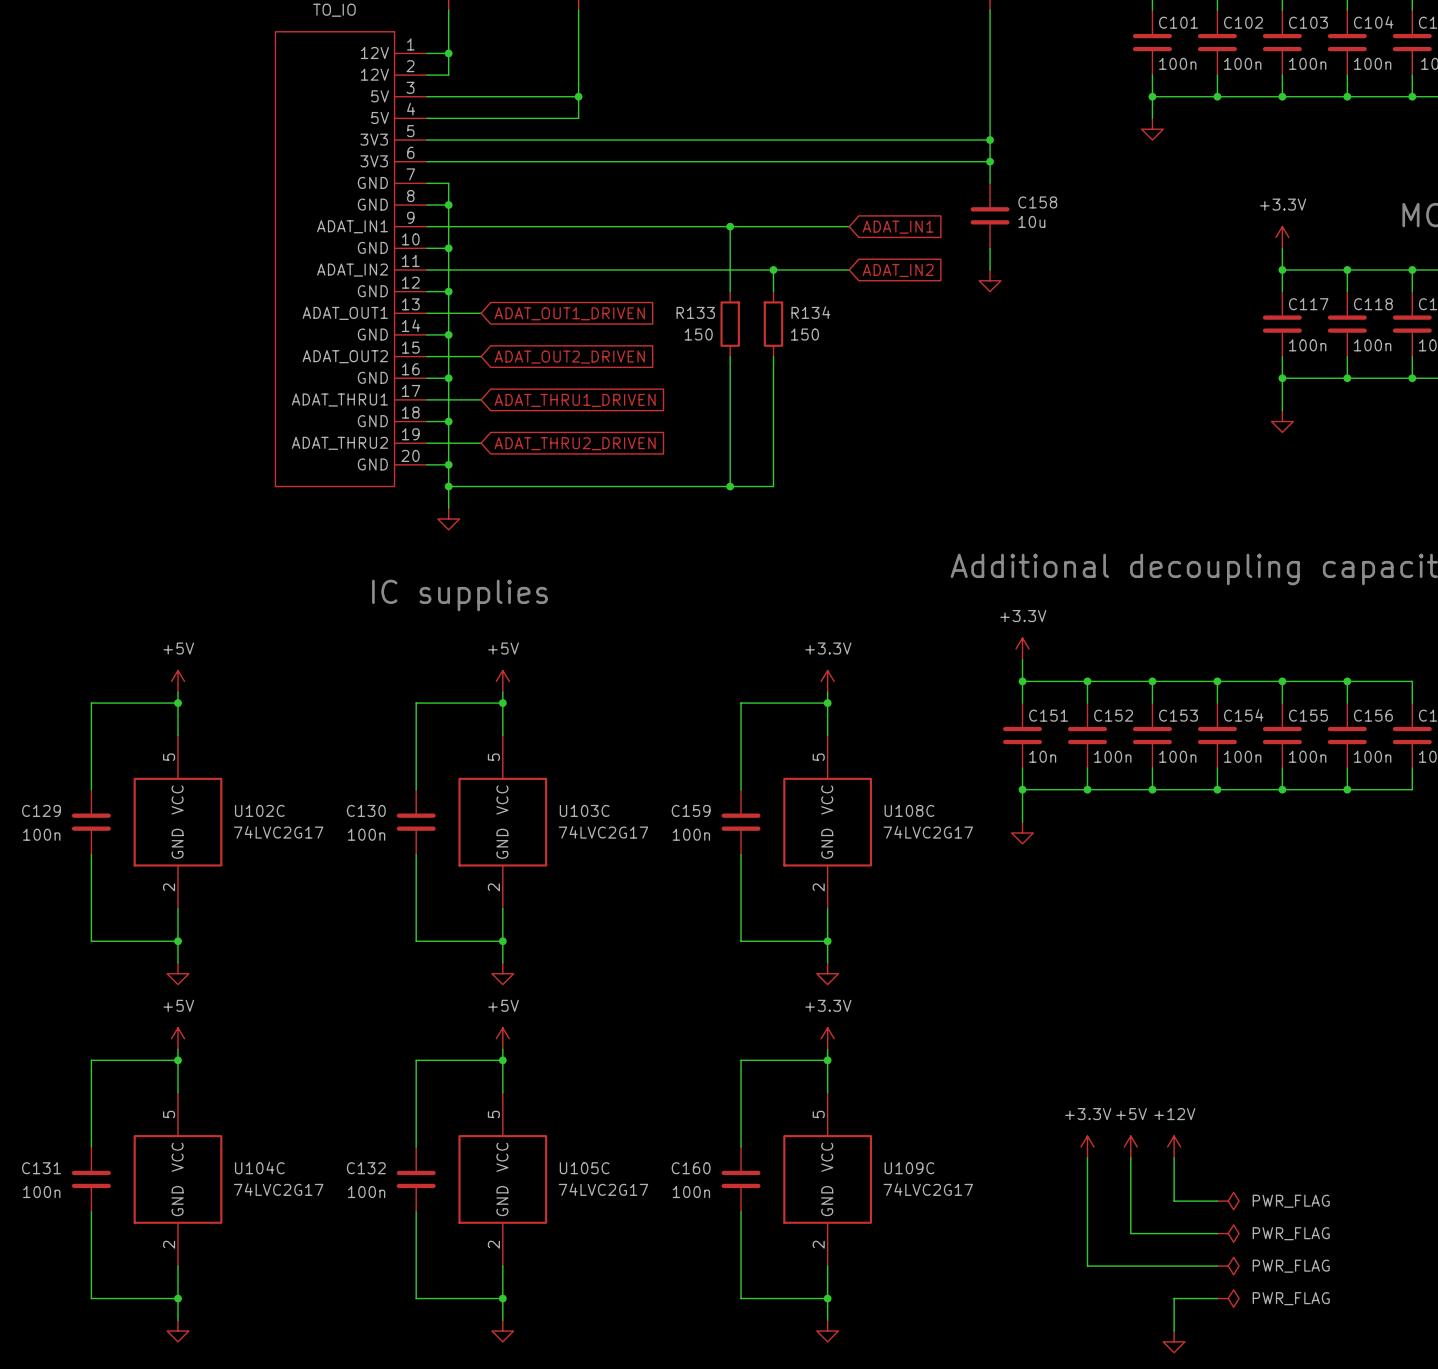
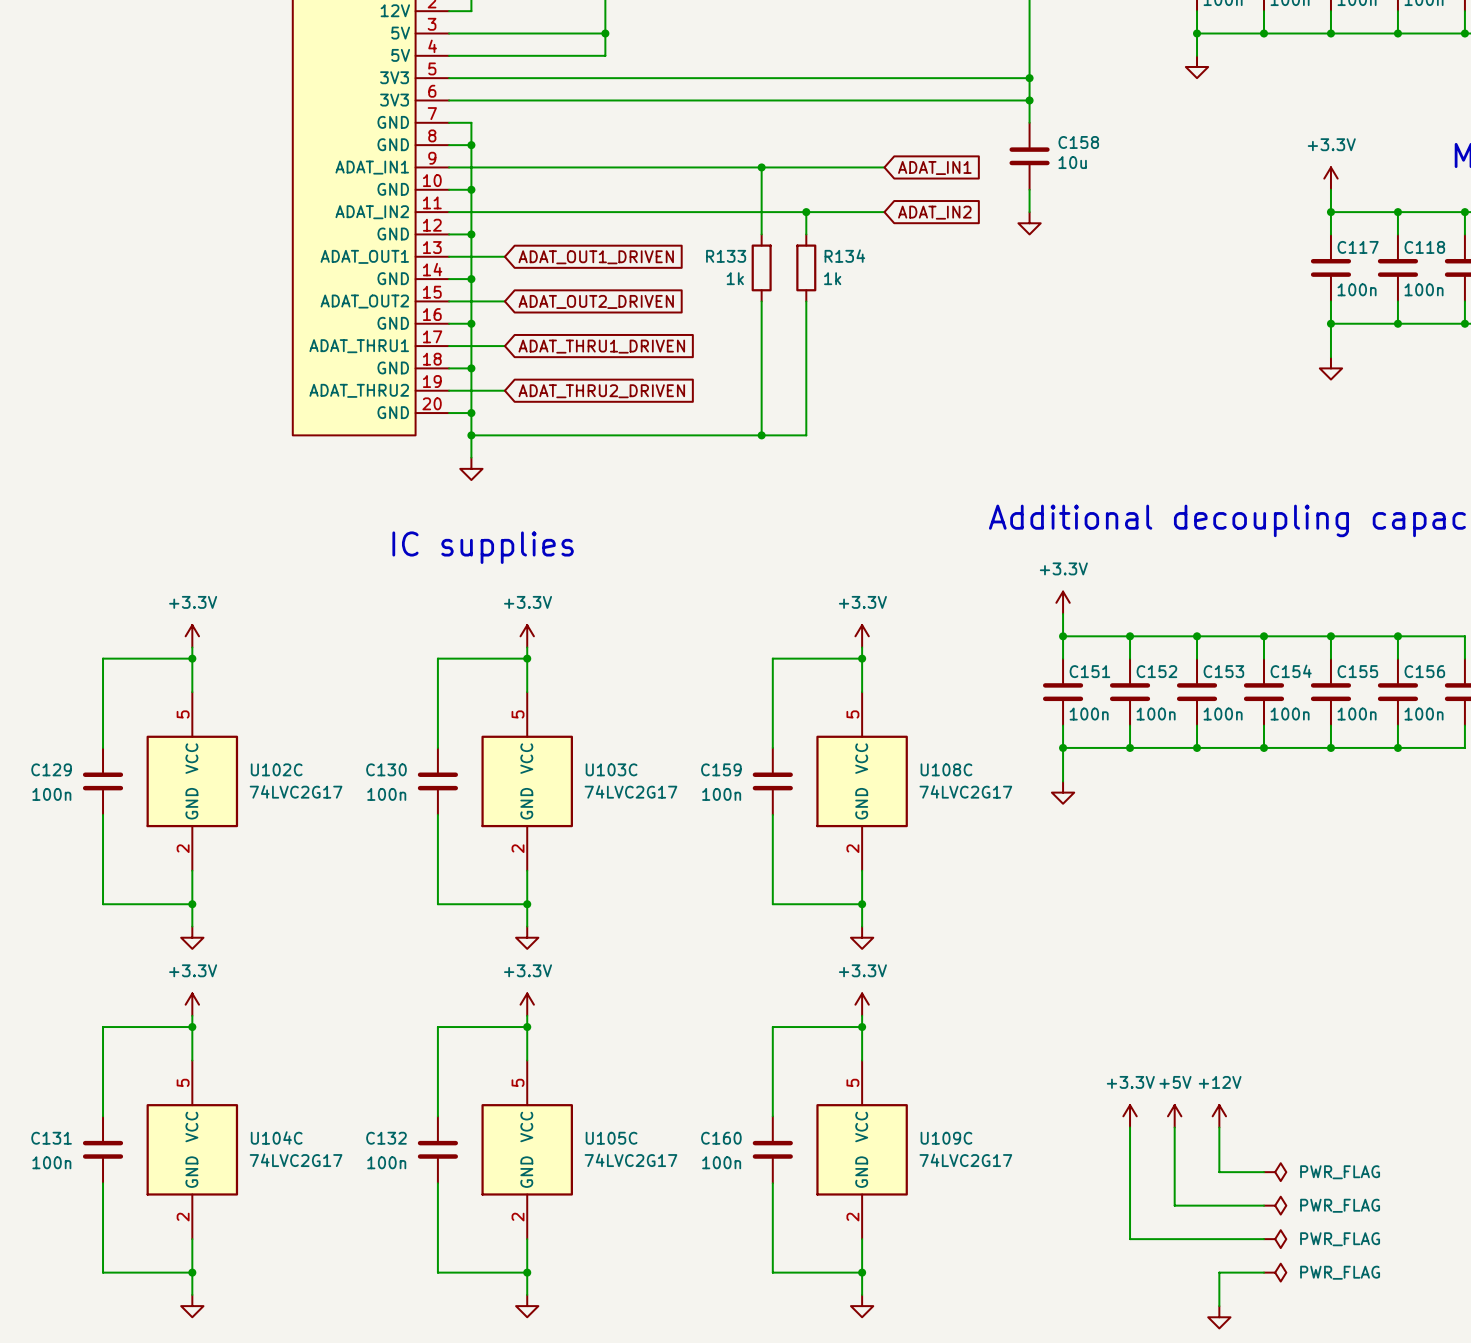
R133 value: 150 (698, 334) -> 1k (735, 278)
R134 value: 150 (804, 334) -> 1k (832, 278)
power symbol: +5V (178, 681) -> +3.3V (192, 636)
power symbol: +5V (502, 681) -> +3.3V (527, 636)
C151 value: 10n (1042, 756) -> 100n (1089, 714)
power symbol: +5V (178, 1038) -> +3.3V (192, 1004)
power symbol: +5V (502, 1038) -> +3.3V (527, 1004)

